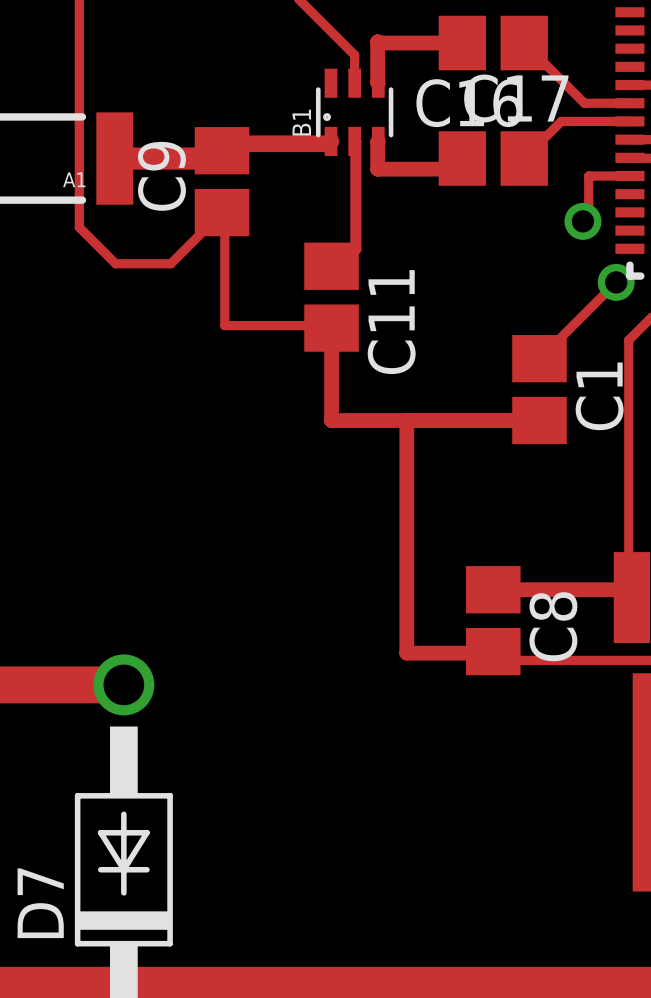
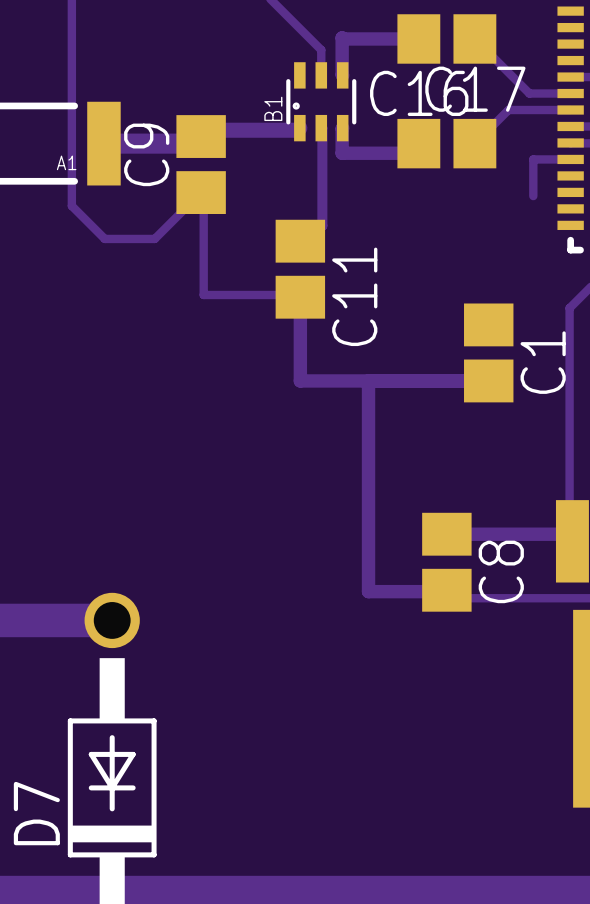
via: (582, 221) -> none
track: (616, 282) (539, 358) -> none
via: (616, 282) -> none

